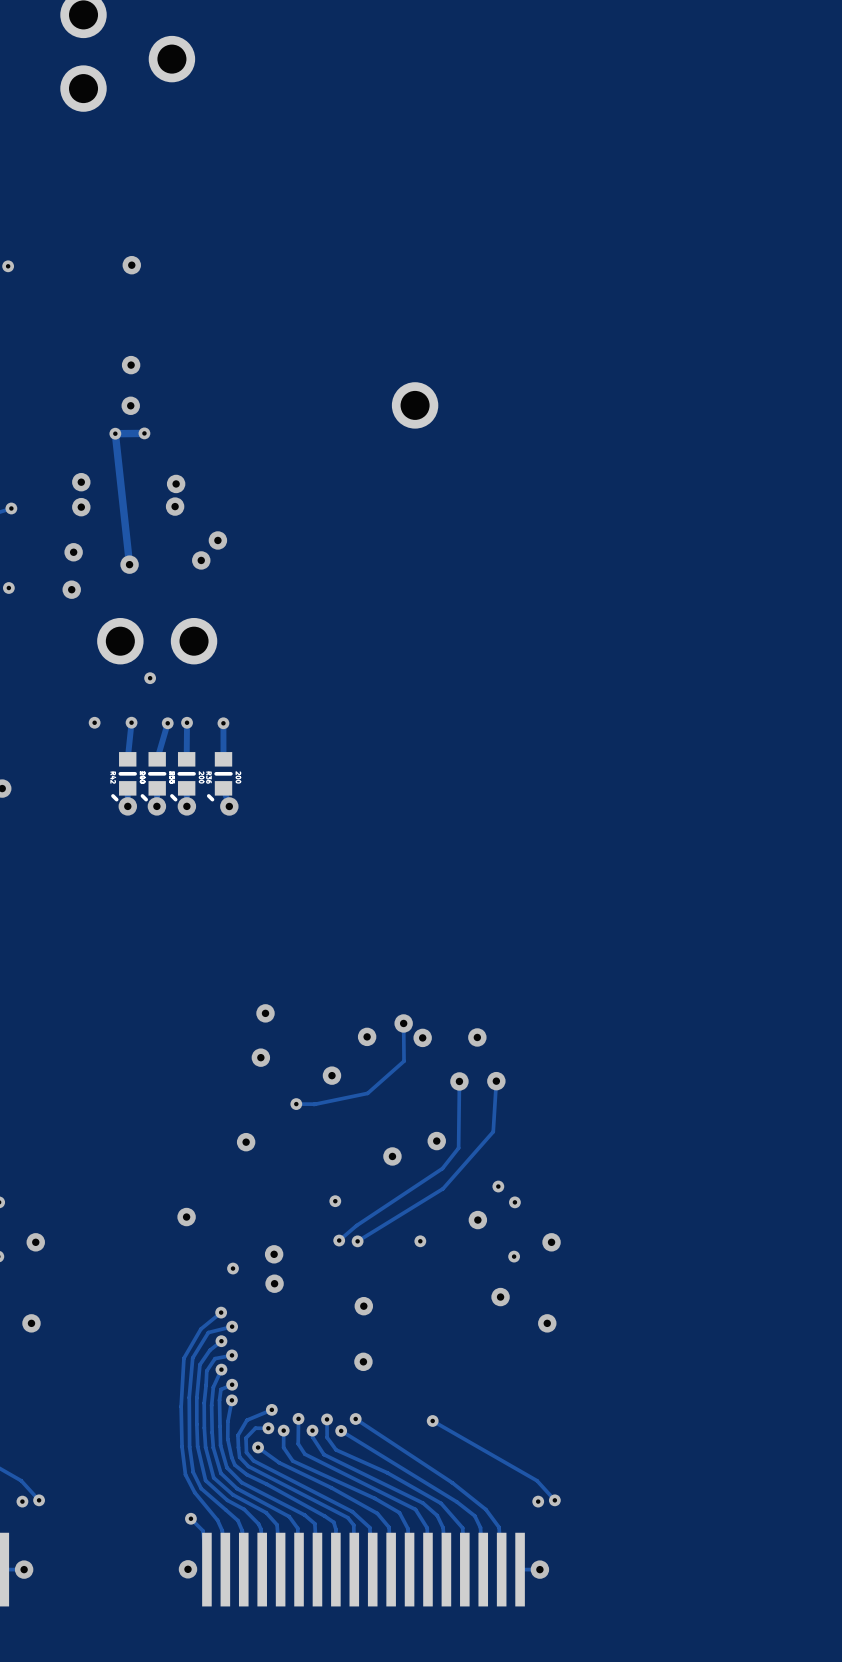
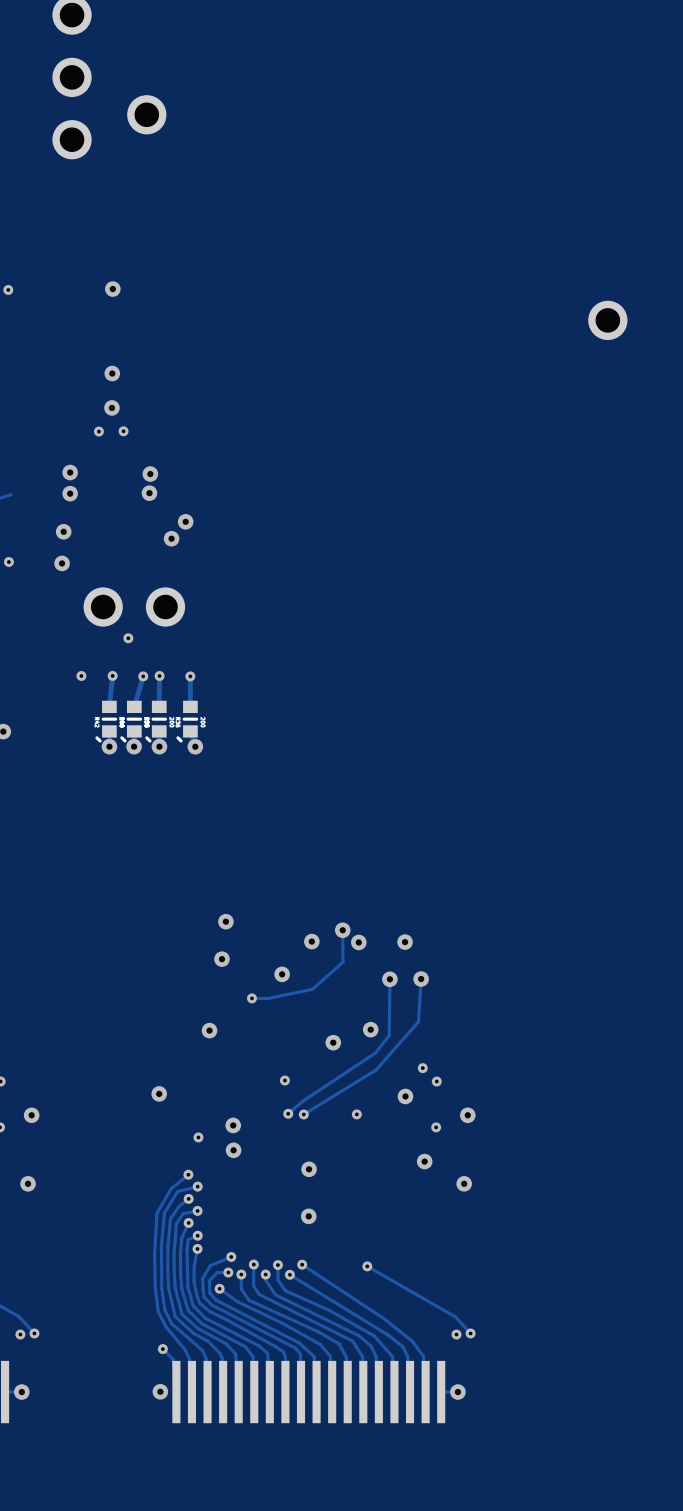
part position: (415, 405) -> (607, 320)
track: (144, 433) (115, 433) (129, 564) -> none
via: (11, 508) -> none
via: (129, 564) -> none

